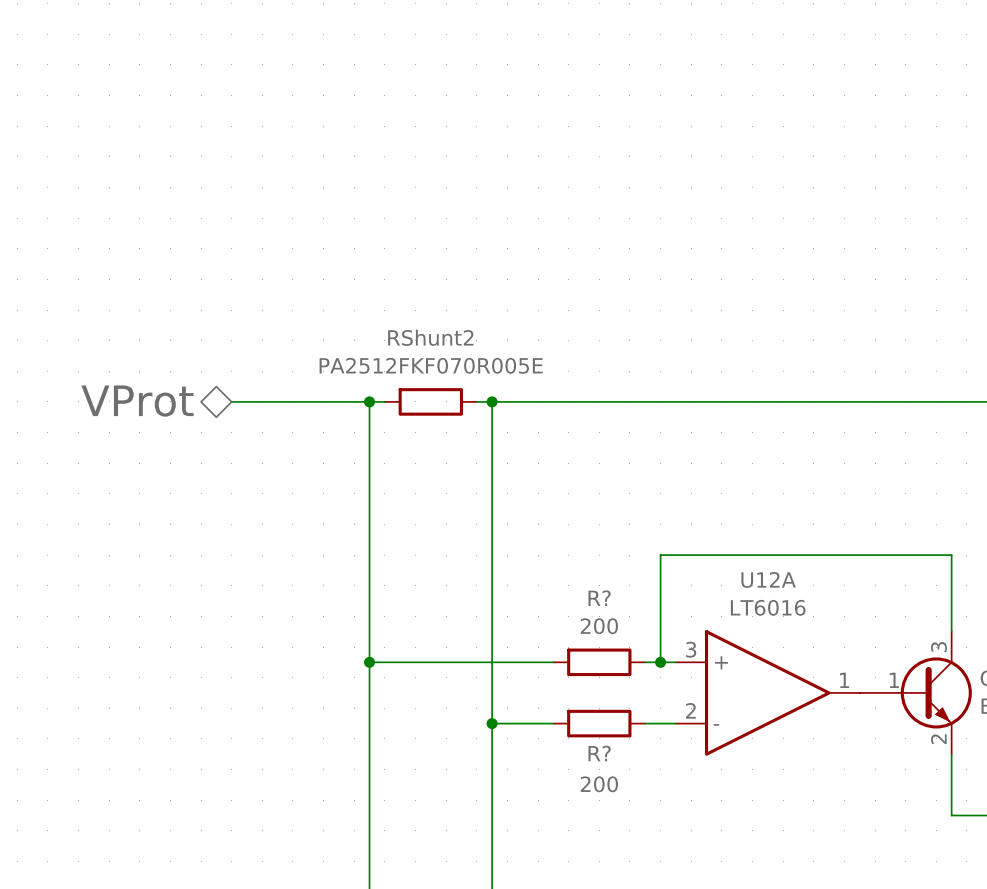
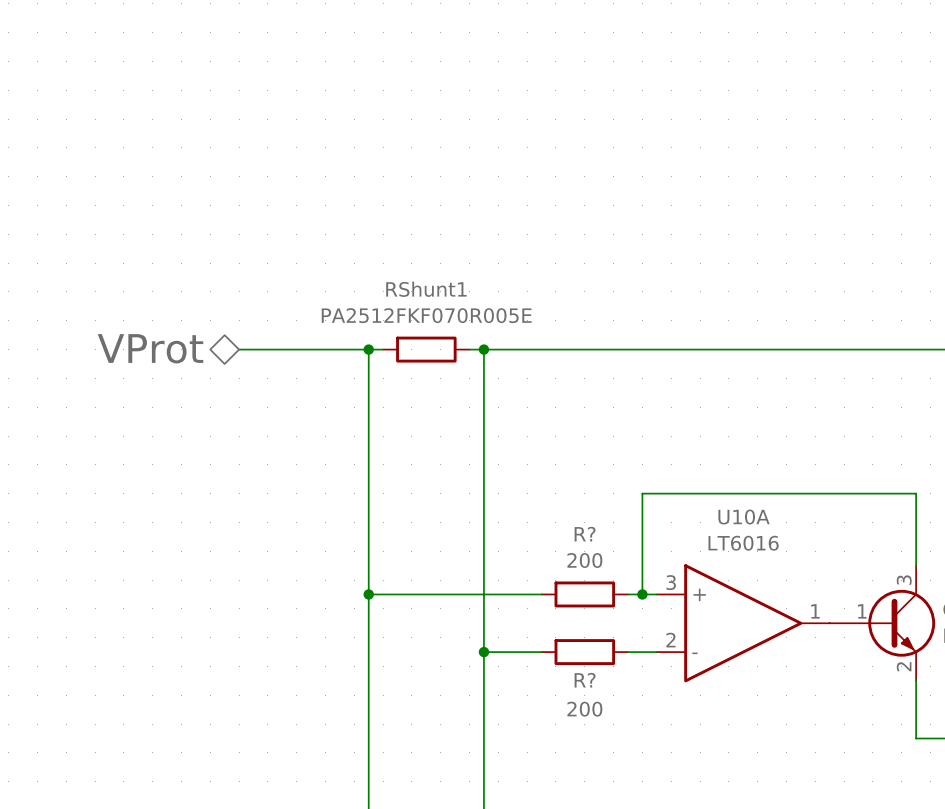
RShunt2 name: RShunt2 (430, 337) -> RShunt1 (426, 289)
U12A name: U12A (768, 579) -> U10A (744, 517)

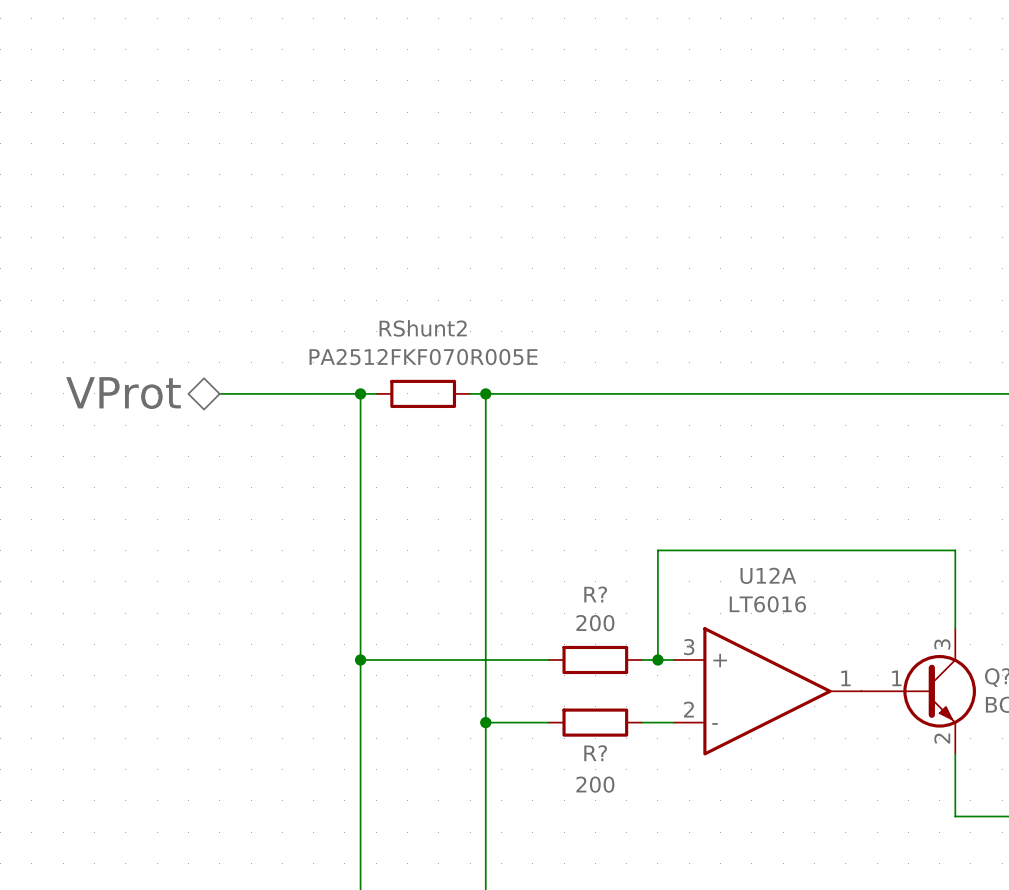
RShunt1 name: RShunt1 (426, 289) -> RShunt2 (423, 328)
U10A name: U10A (744, 517) -> U12A (768, 575)

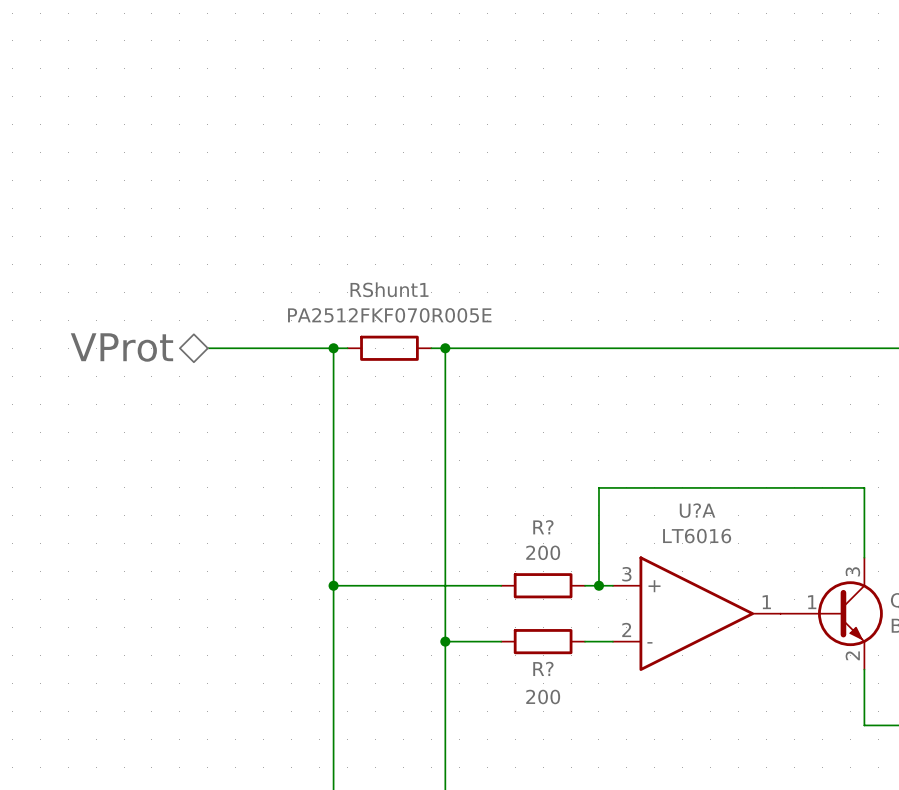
RShunt2 name: RShunt2 (423, 328) -> RShunt1 (389, 289)
U12A name: U12A (768, 575) -> U?A (697, 510)

